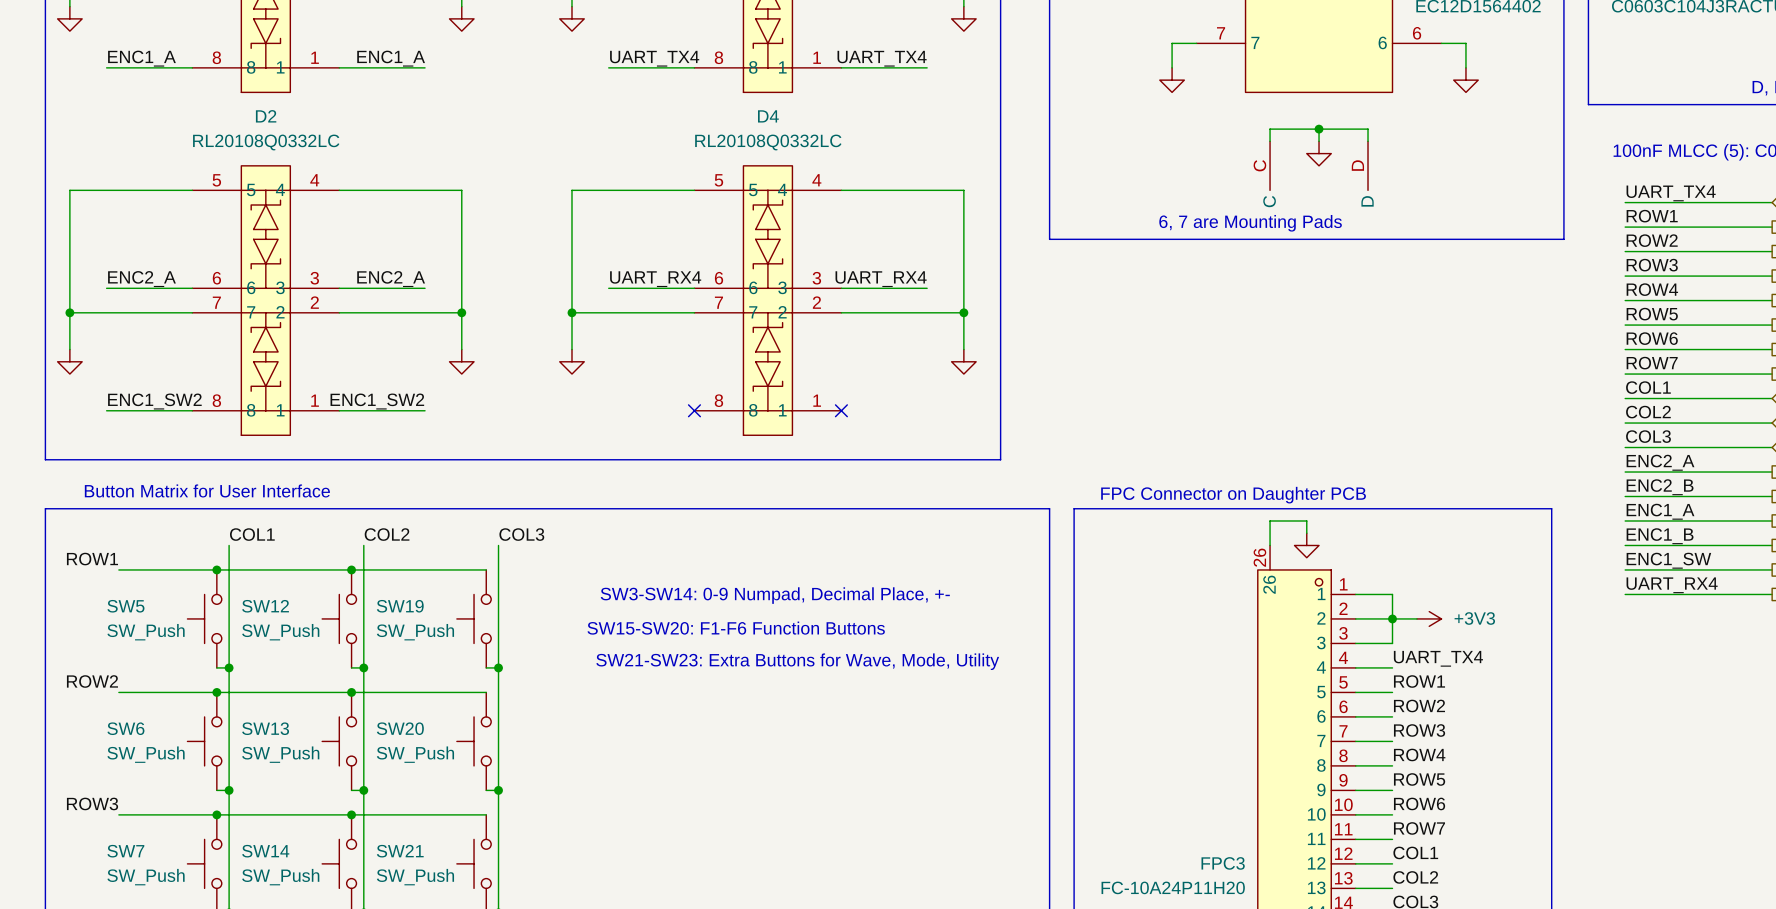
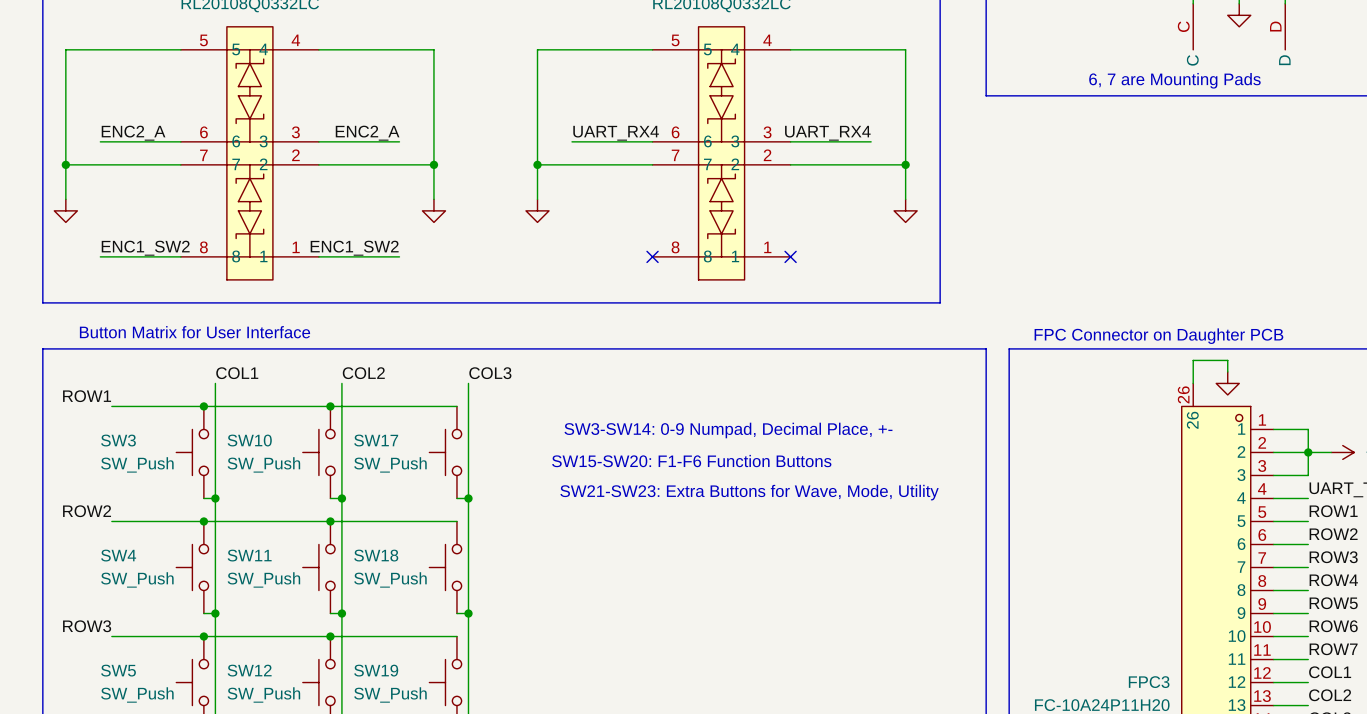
SW5 name: SW5 (125, 606) -> SW3 (118, 440)
SW12 name: SW12 (265, 606) -> SW10 (249, 440)
SW19 name: SW19 (400, 606) -> SW17 (376, 440)
SW6 name: SW6 (125, 728) -> SW4 (118, 555)
SW13 name: SW13 (265, 728) -> SW11 (249, 555)
SW20 name: SW20 (400, 728) -> SW18 (376, 555)
SW7 name: SW7 (125, 851) -> SW5 (118, 670)
SW14 name: SW14 (265, 851) -> SW12 (249, 670)
SW21 name: SW21 (400, 851) -> SW19 (376, 670)

